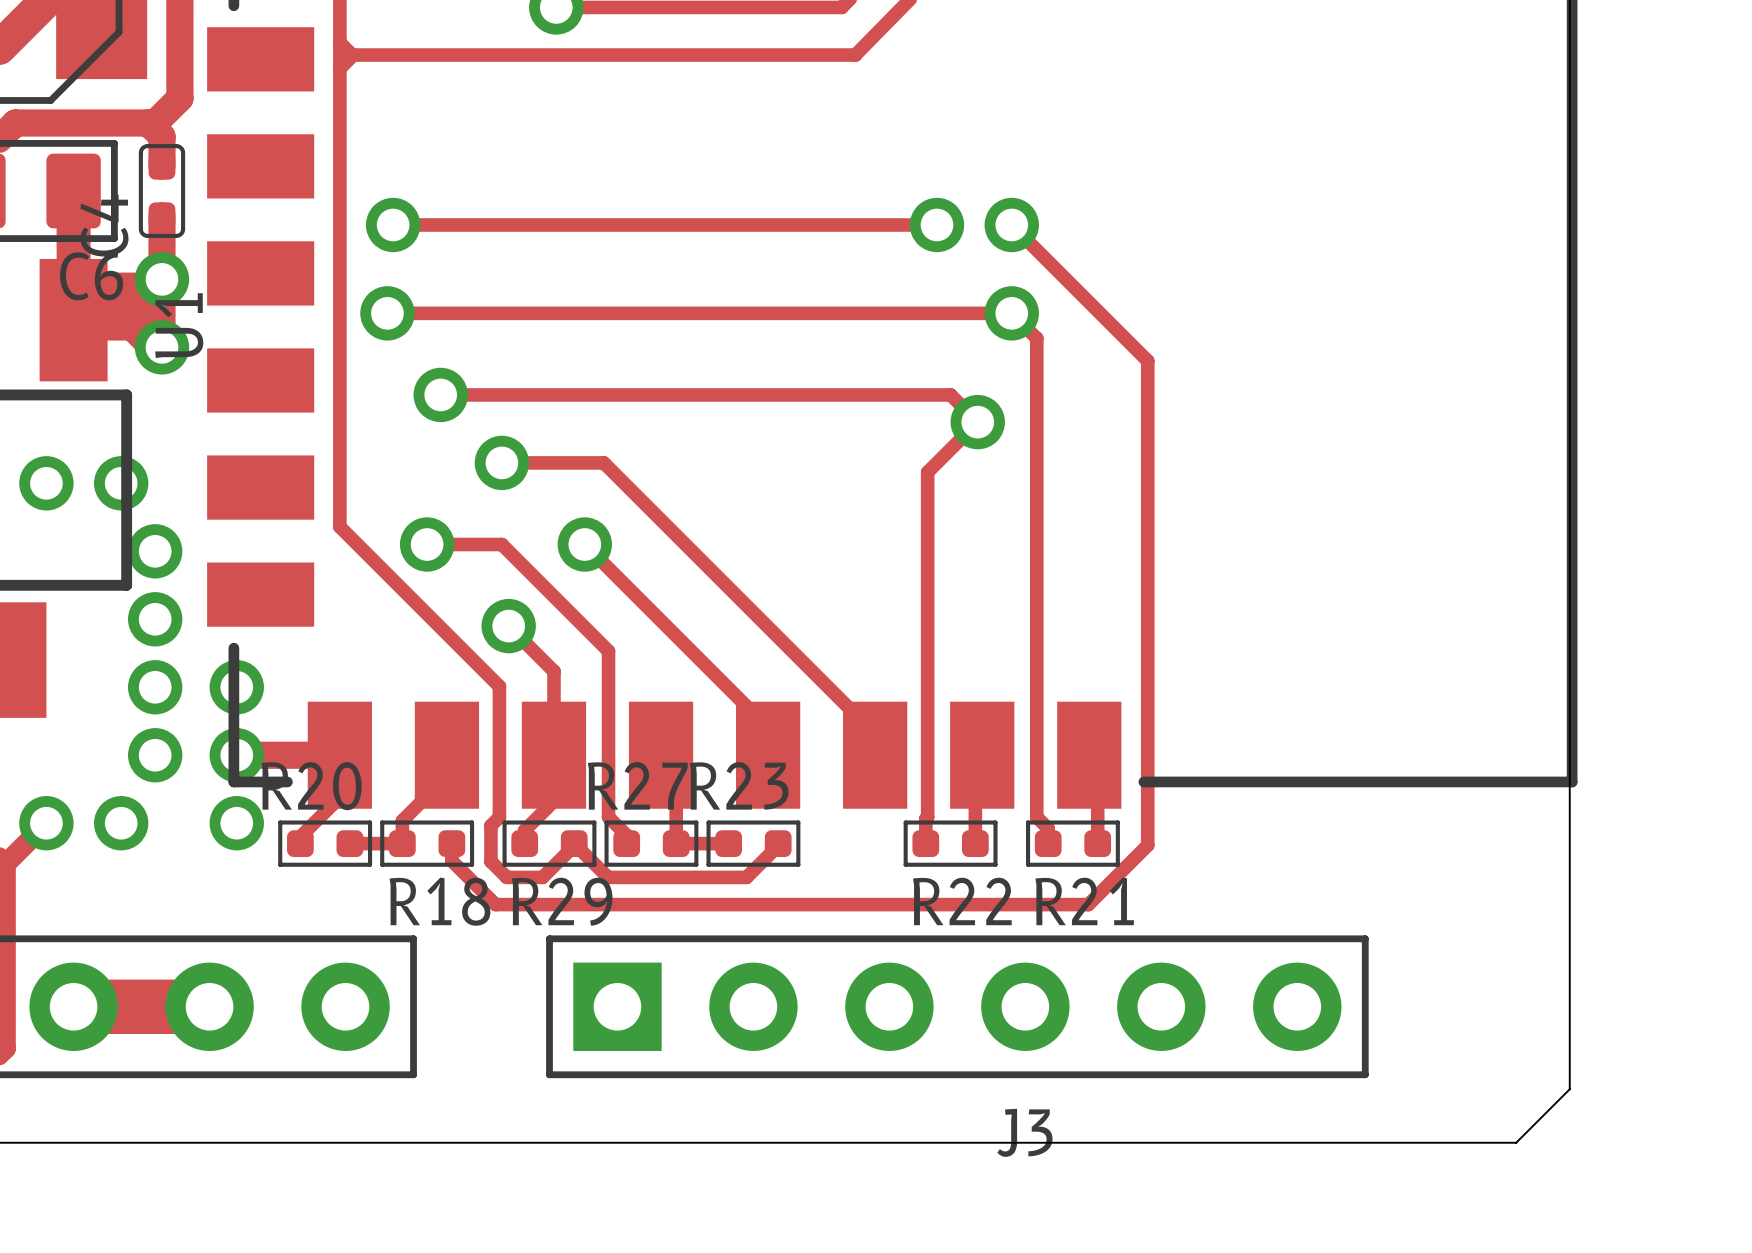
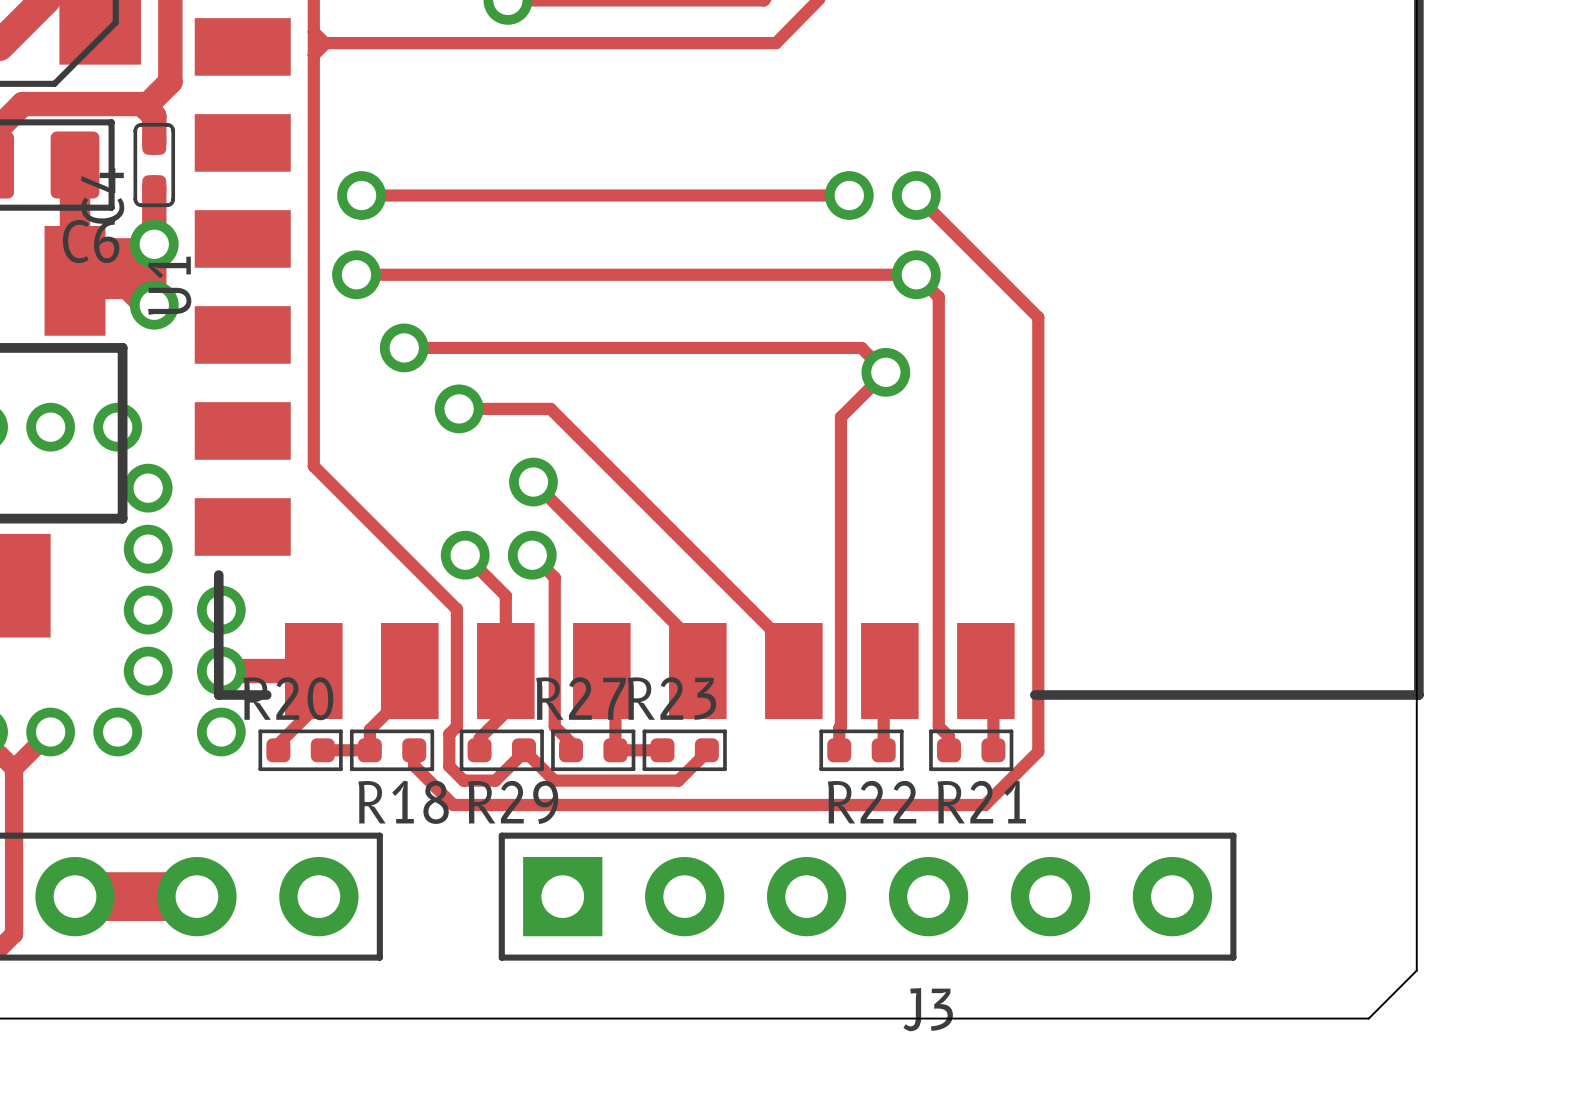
track: (427, 544) (501, 544) (583, 626) -> none
via position: (427, 544) -> (532, 555)

